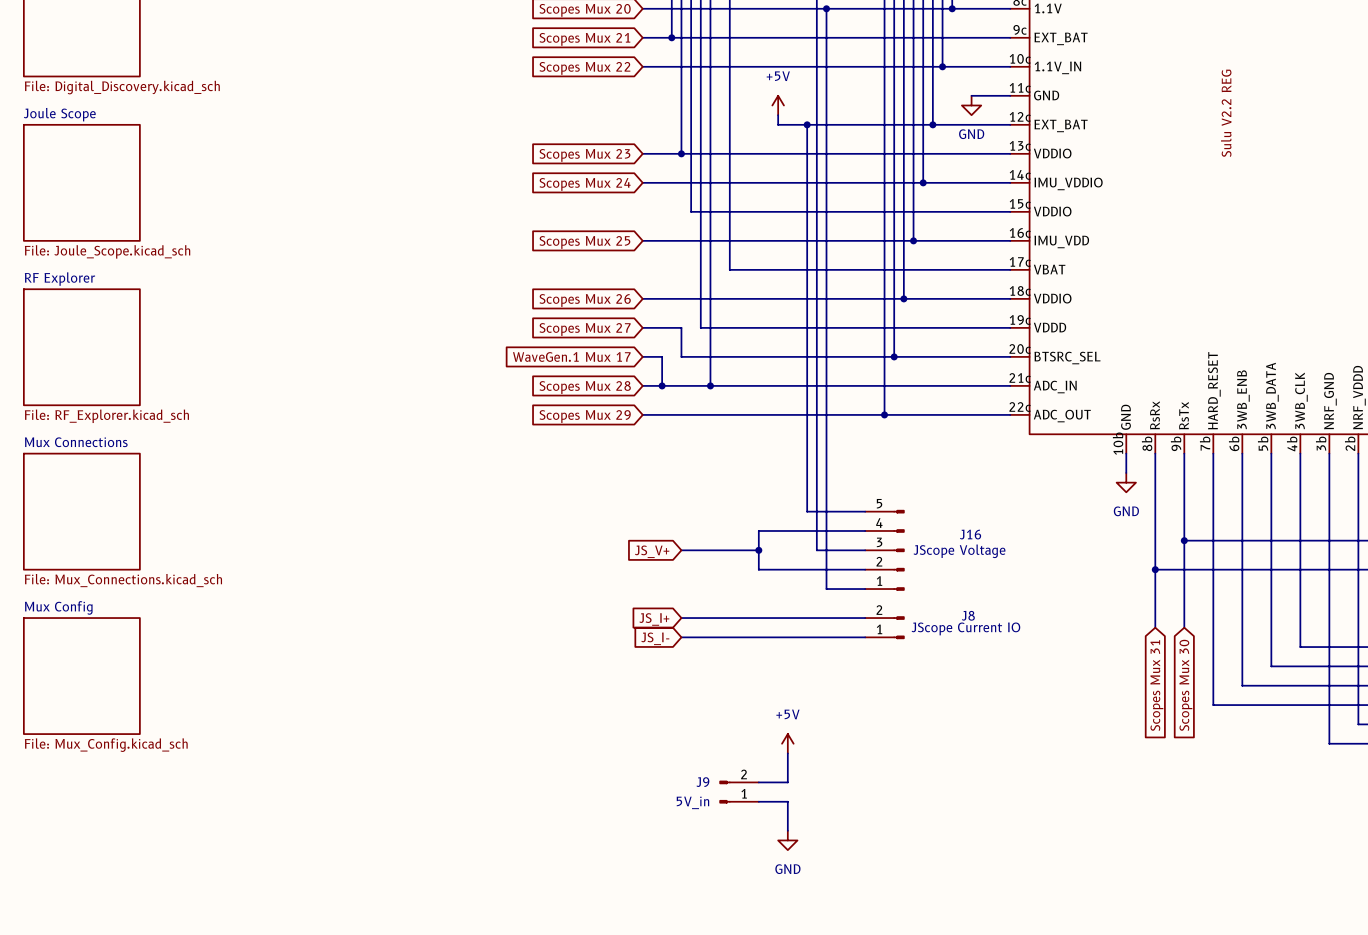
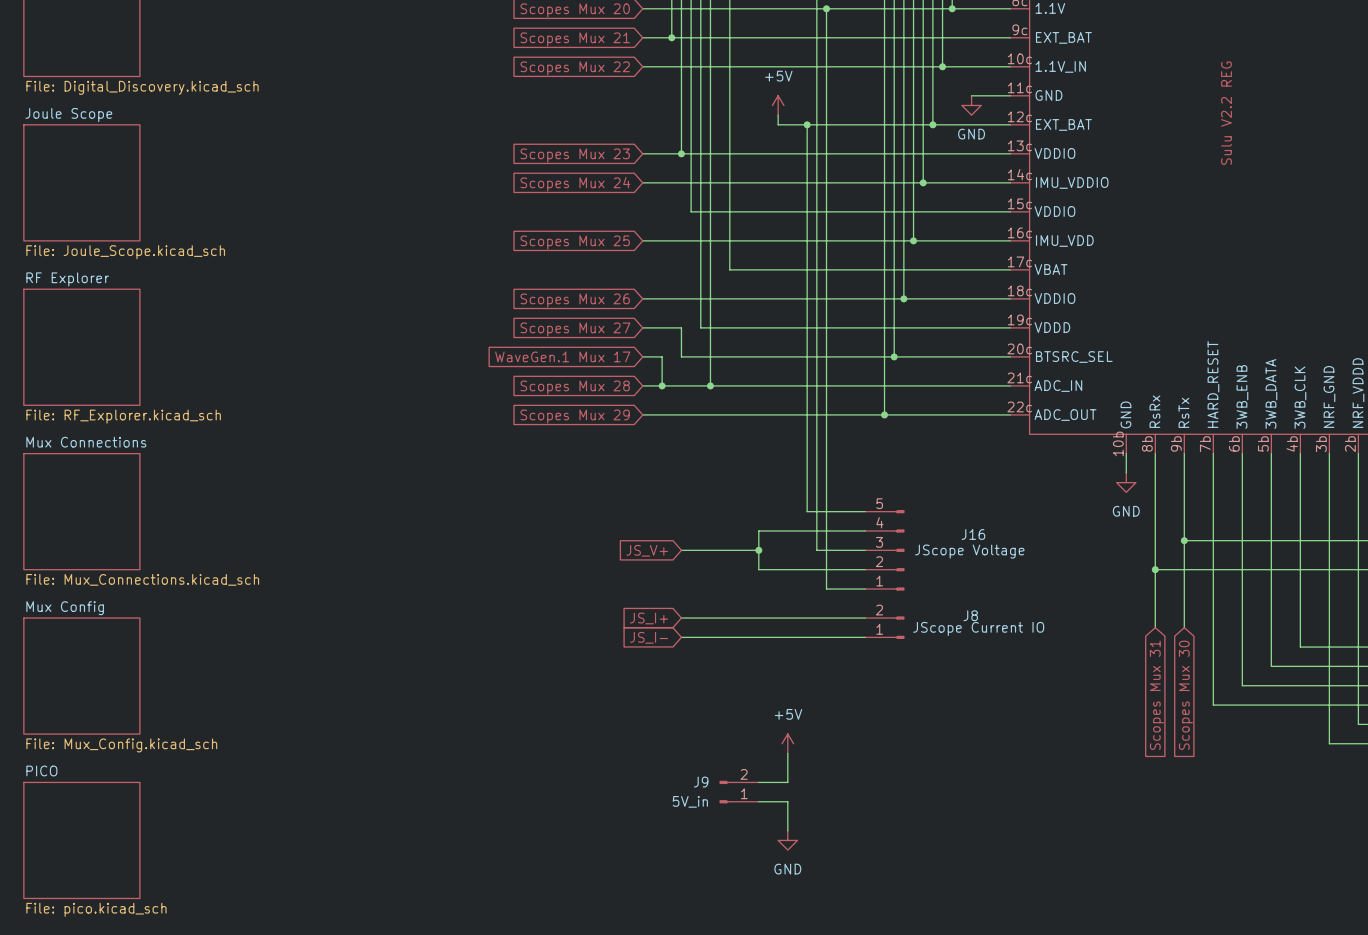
sheet PICO: none -> File: pico.kicad_sch (81, 840)

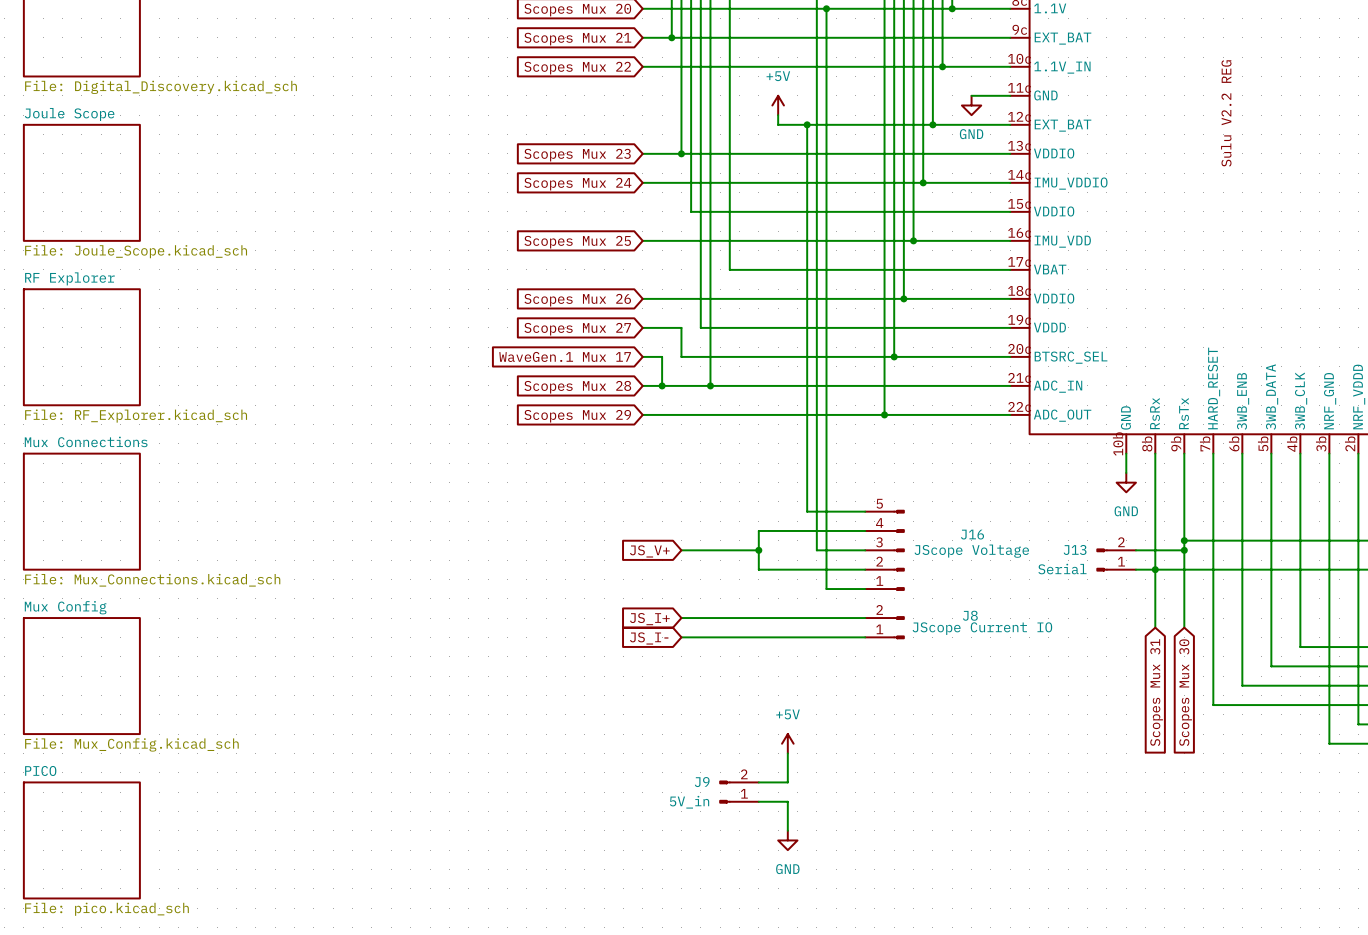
wire: none -> (1135, 550) (1184, 550)
junction: none -> (1184, 550)
J13: none -> Serial (1116, 560)
wire: none -> (1135, 569) (1155, 569)

